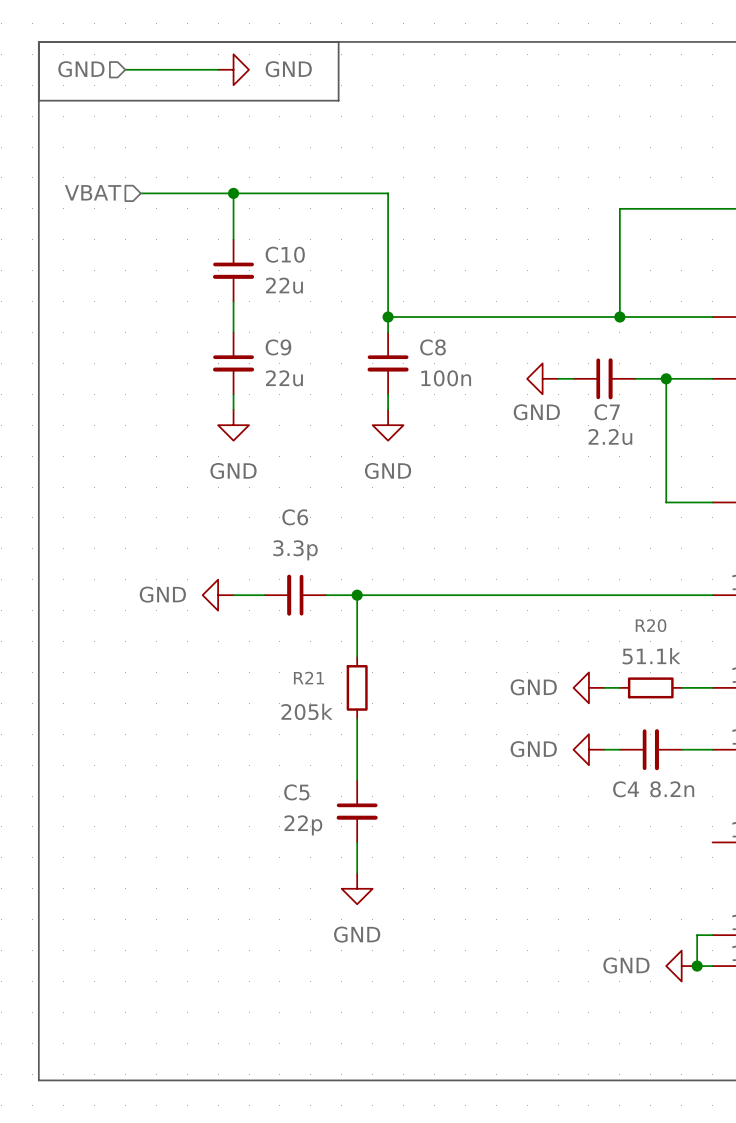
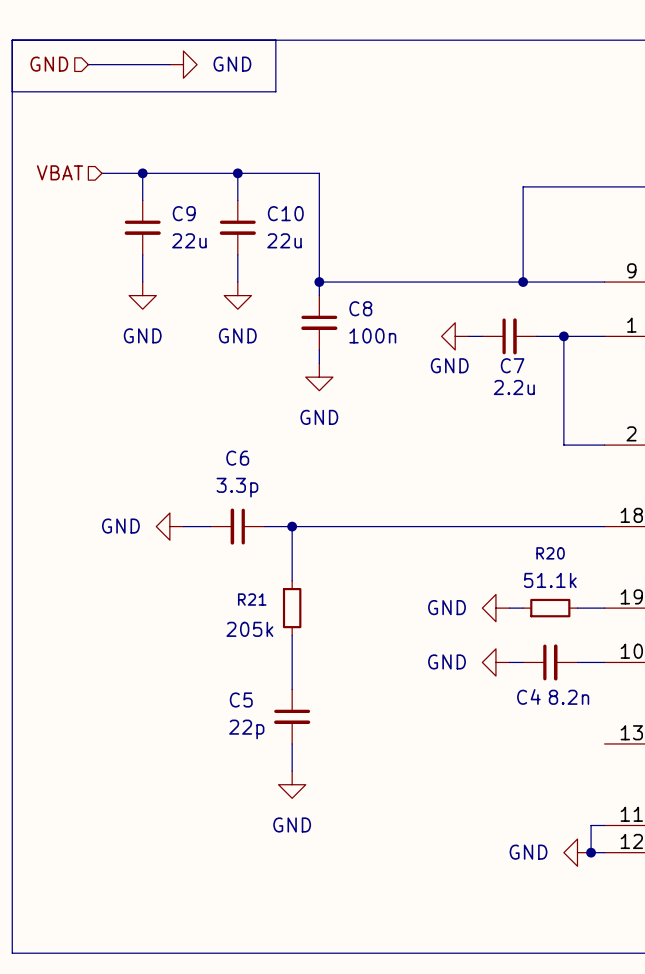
wire: none -> (142, 173) (142, 200)
junction: none -> (142, 173)
wire: (233, 193) (233, 239) -> none
junction: (233, 193) -> none
wire: none -> (237, 173) (237, 200)
junction: none -> (237, 173)
C10 position: (233, 270) -> (237, 227)
wire: none -> (237, 254) (237, 282)
wire: (233, 301) (233, 332) -> (142, 254) (142, 282)
power symbol: none -> GND (142, 295)
power symbol: none -> GND (237, 295)
C9 position: (233, 363) -> (142, 227)
wire: (233, 394) (233, 409) -> none
power symbol: GND (233, 425) -> none

